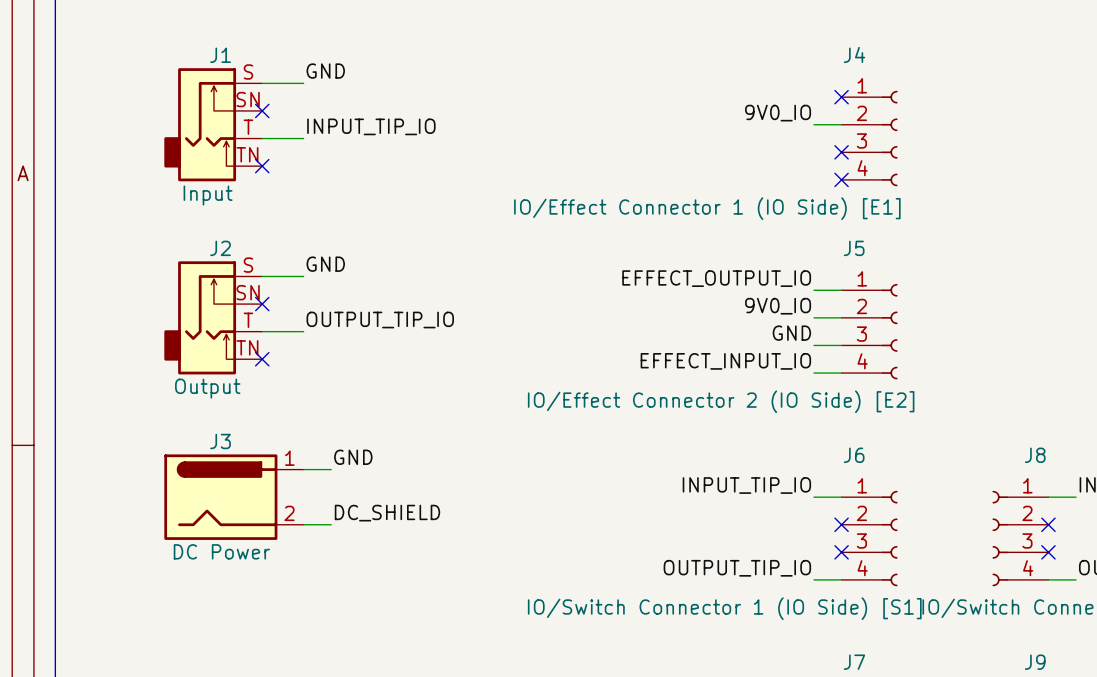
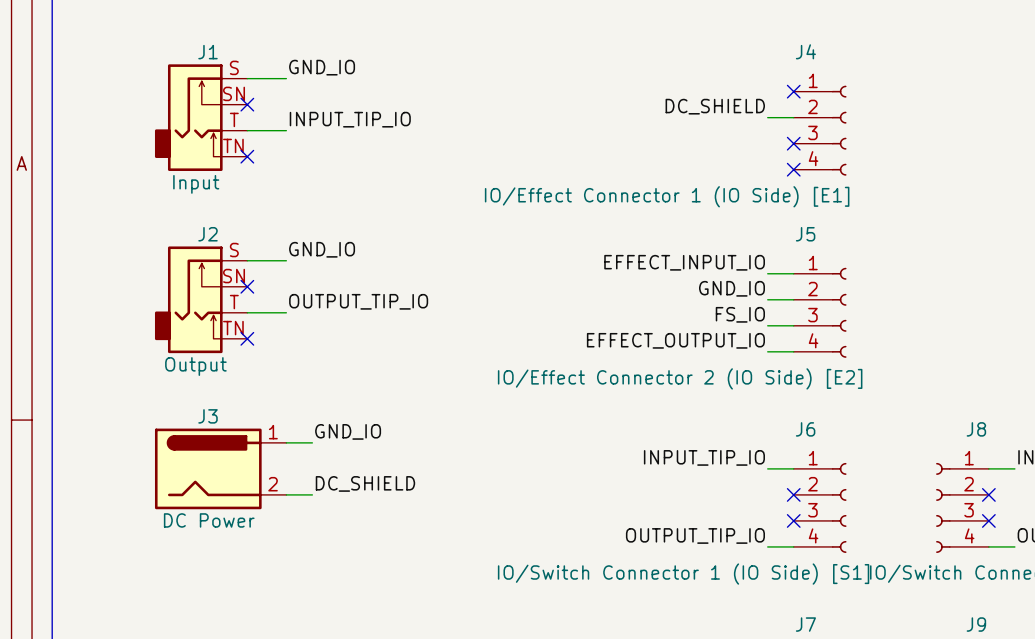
label: GND (325, 71) -> GND_IO (322, 67)
label: 9V0_IO (778, 113) -> DC_SHIELD (715, 106)
label: GND (325, 264) -> GND_IO (322, 249)
label: EFFECT_OUTPUT_IO (716, 278) -> EFFECT_INPUT_IO (684, 262)
label: 9V0_IO (778, 306) -> GND_IO (731, 288)
label: GND (791, 333) -> FS_IO (740, 314)
label: EFFECT_INPUT_IO (725, 361) -> EFFECT_OUTPUT_IO (675, 340)
label: GND (353, 457) -> GND_IO (348, 431)

